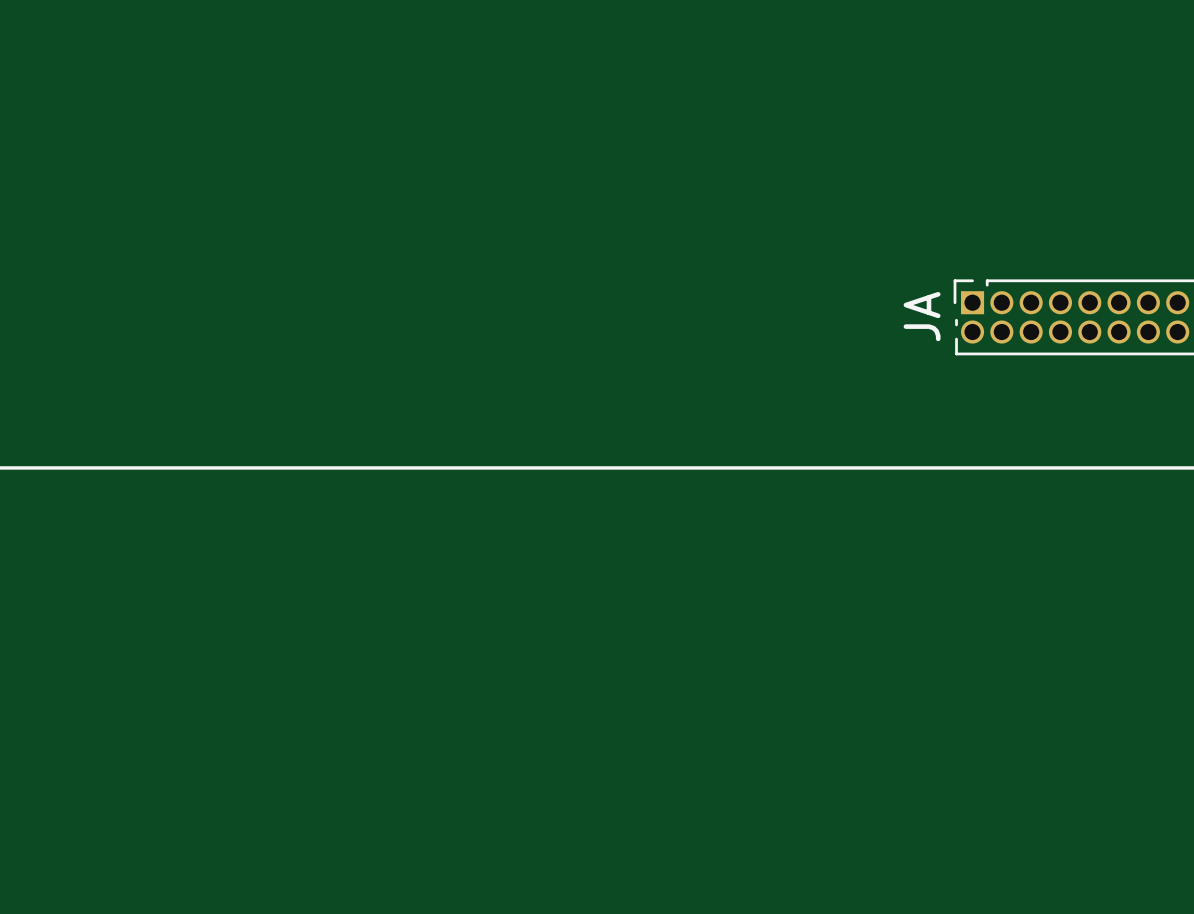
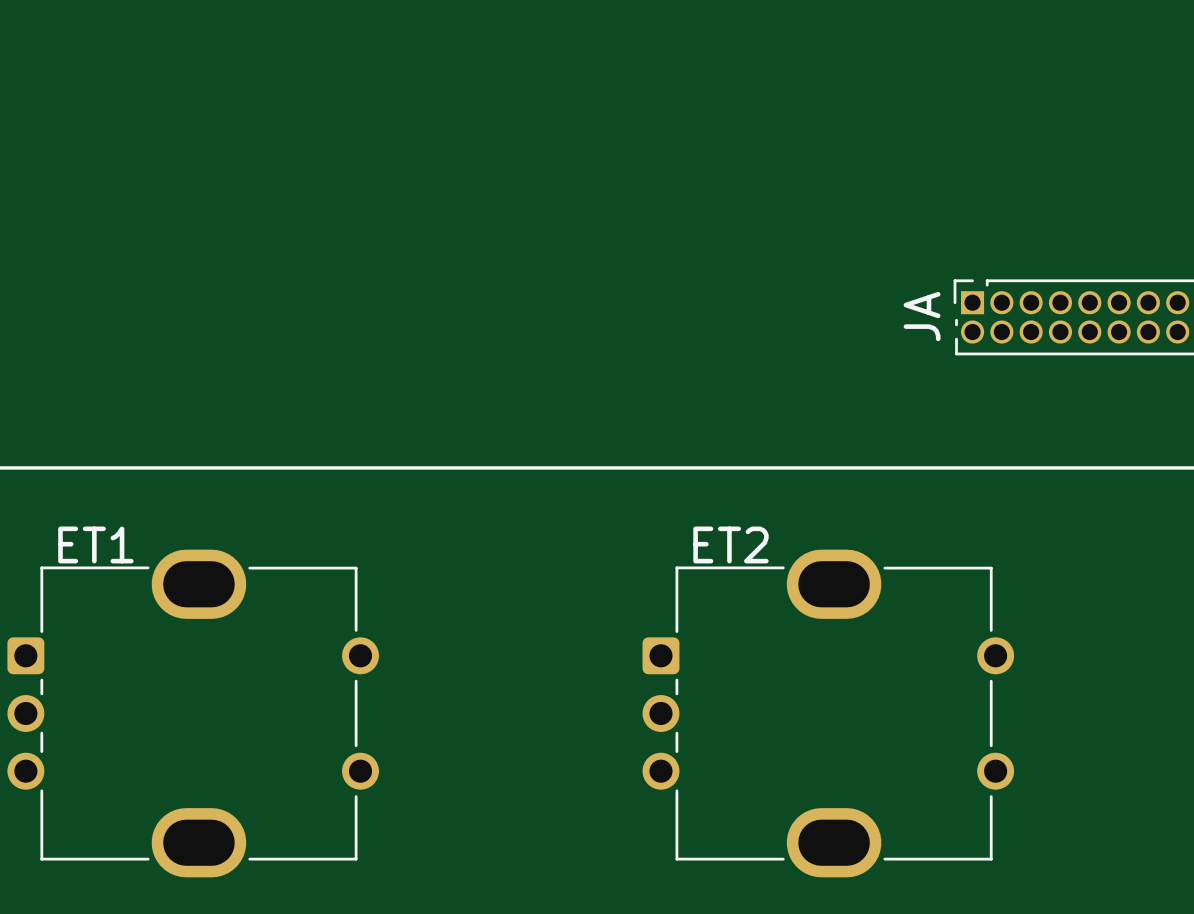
ET1: none -> (193, 713)
ET2: none -> (828, 713)

